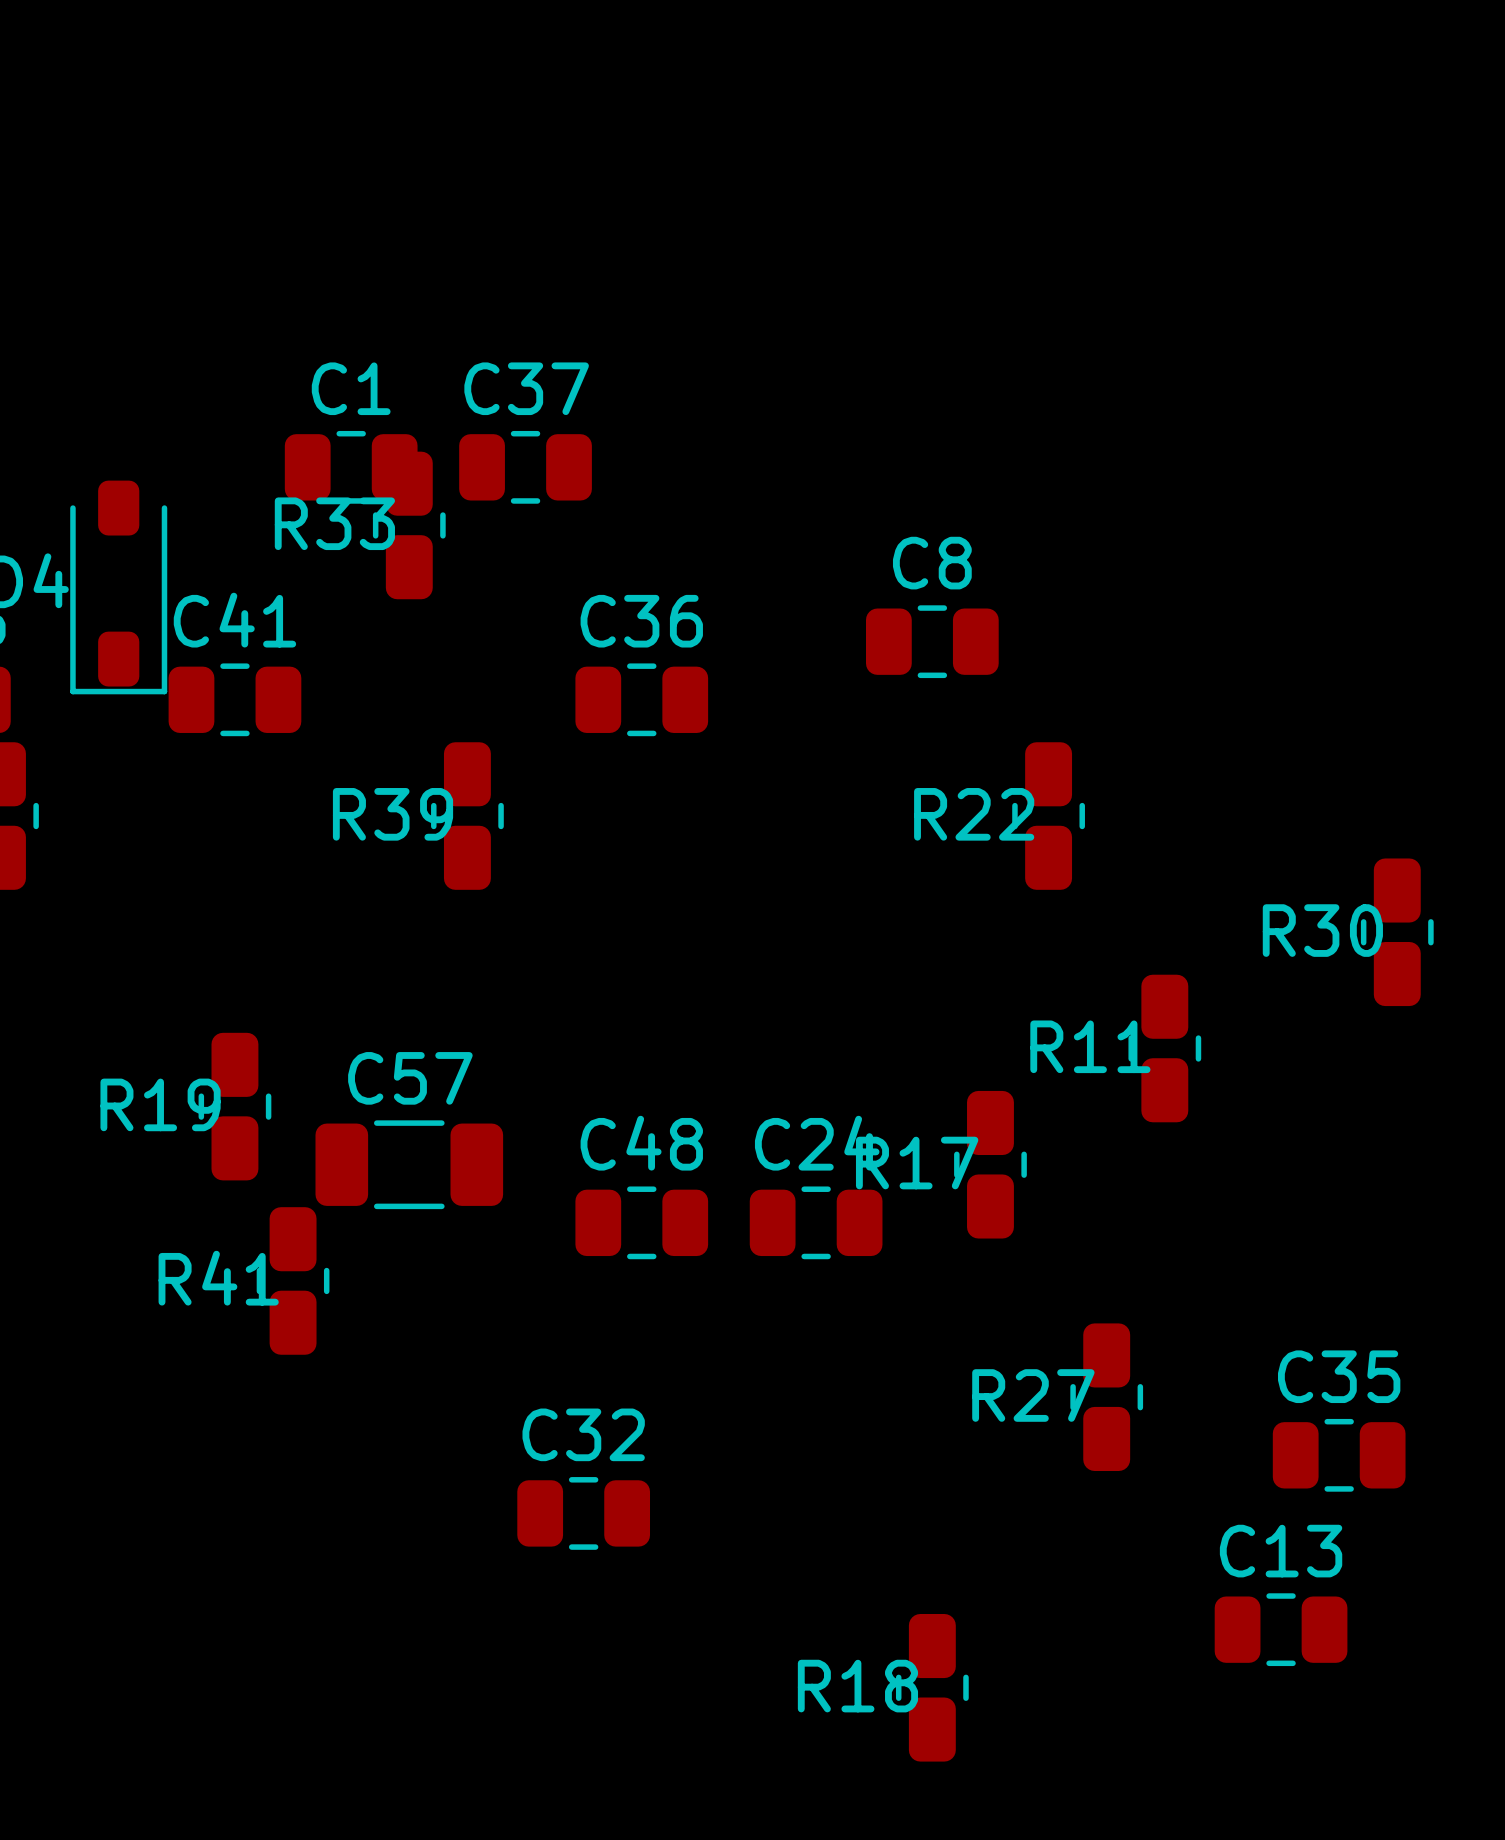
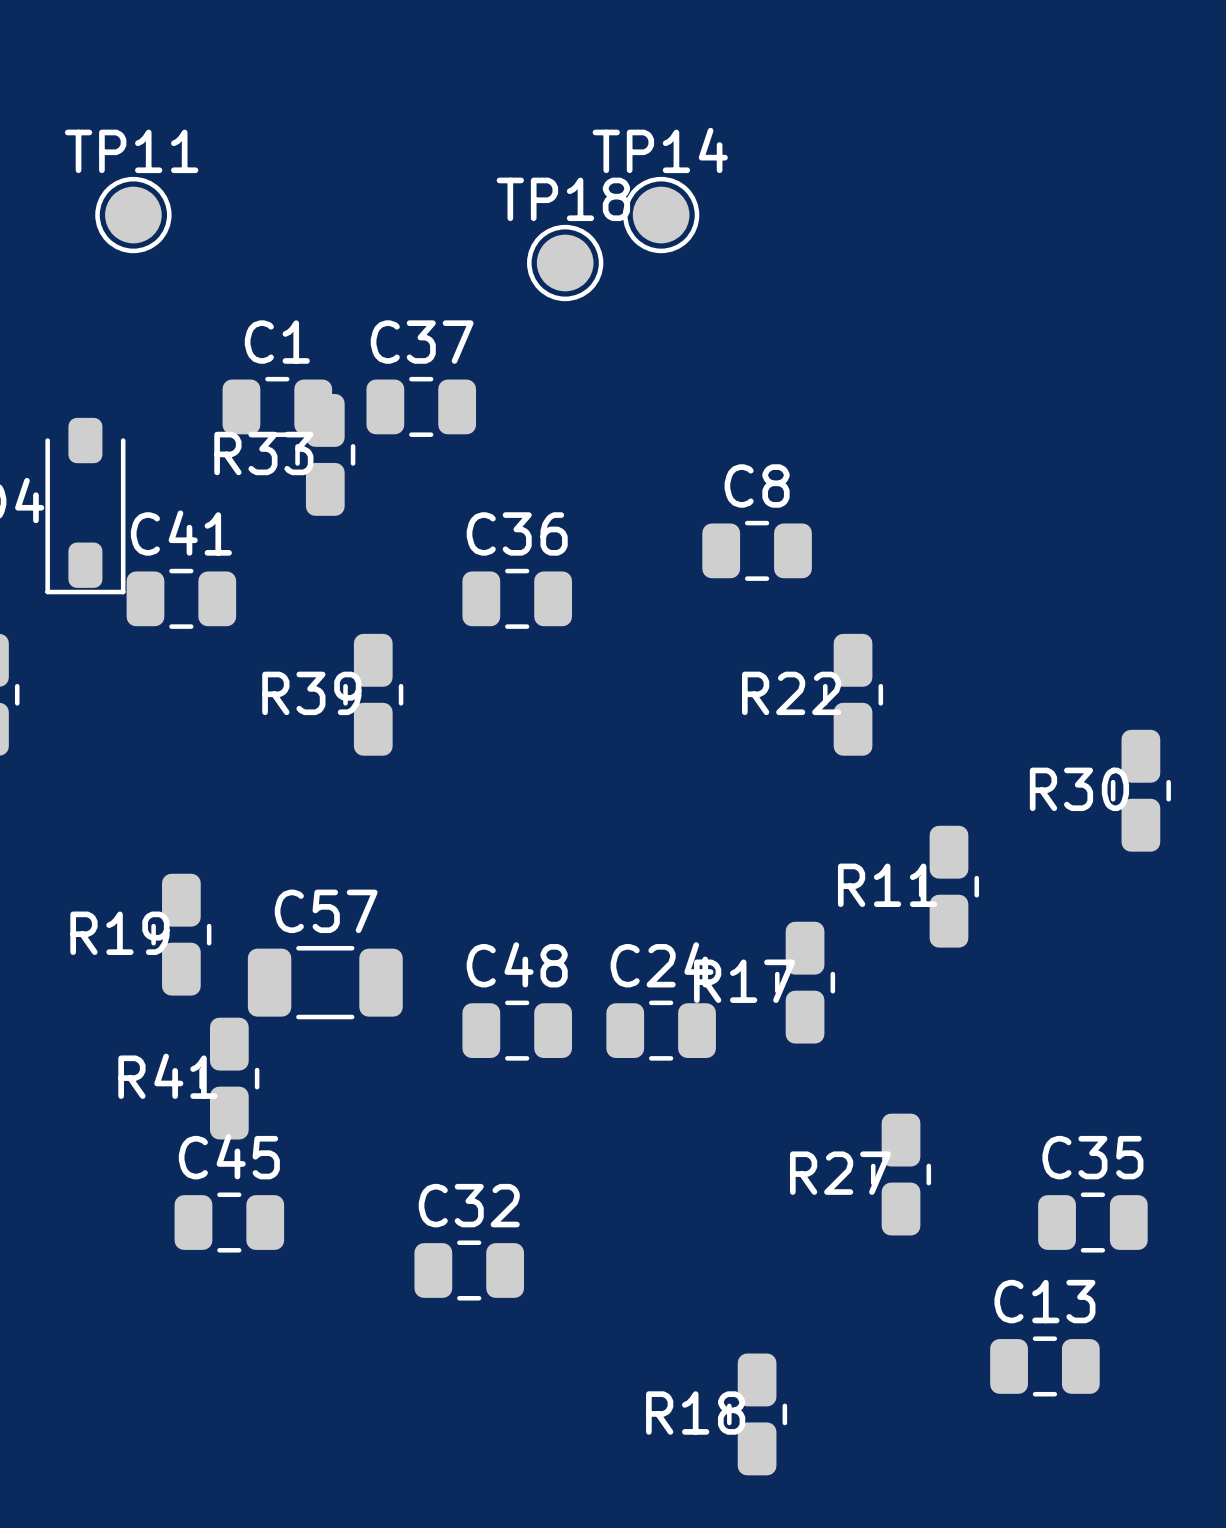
TP11: none -> (133, 215)
TP14: none -> (661, 215)
TP18: none -> (565, 263)
C45: none -> (229, 1222)

